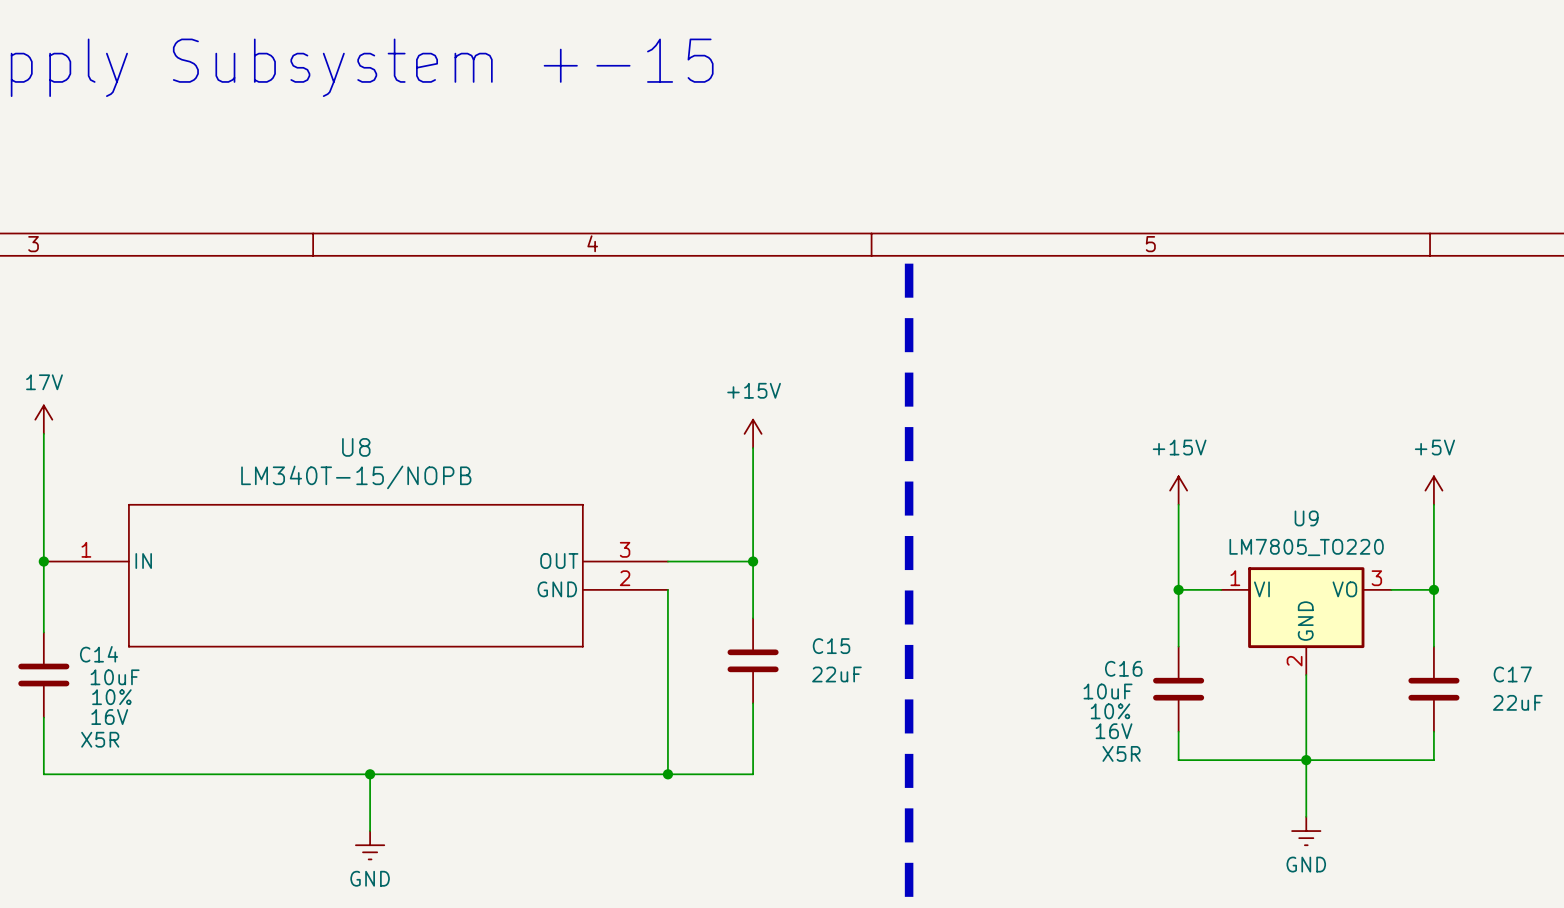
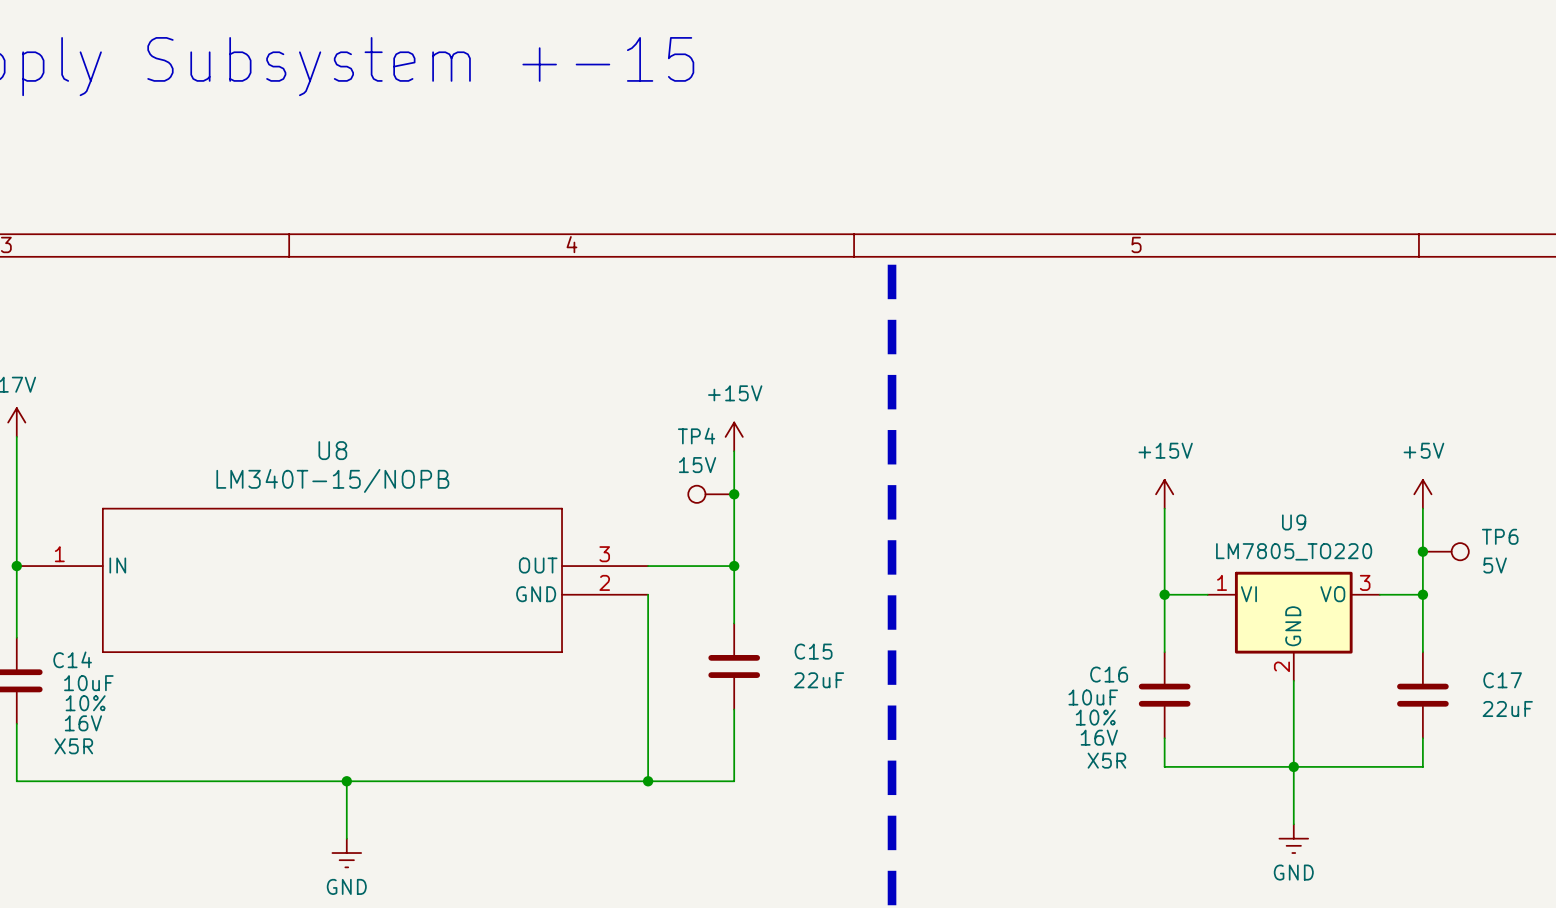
TP4: none -> 15V (711, 494)
junction: none -> (734, 494)
junction: none -> (1422, 551)
TP6: none -> 5V (1445, 551)

